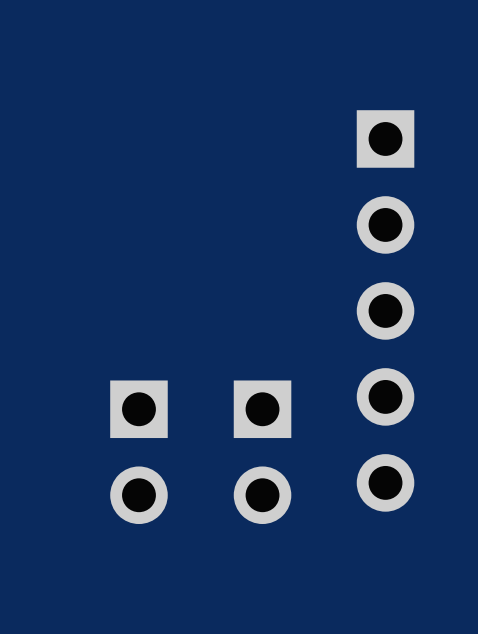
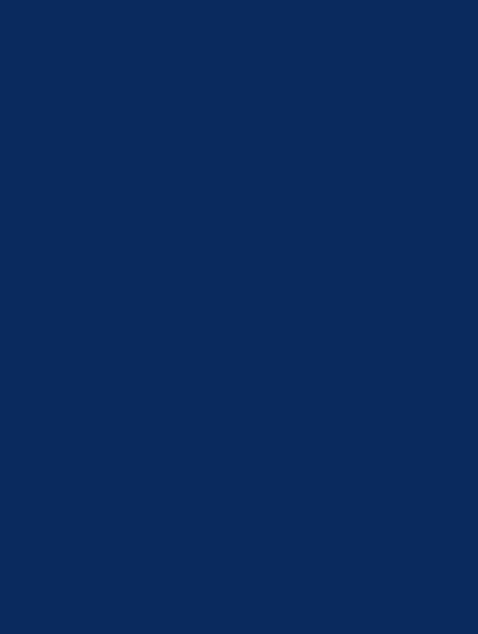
part: (385, 310) -> none
part: (138, 452) -> none
part: (262, 452) -> none

